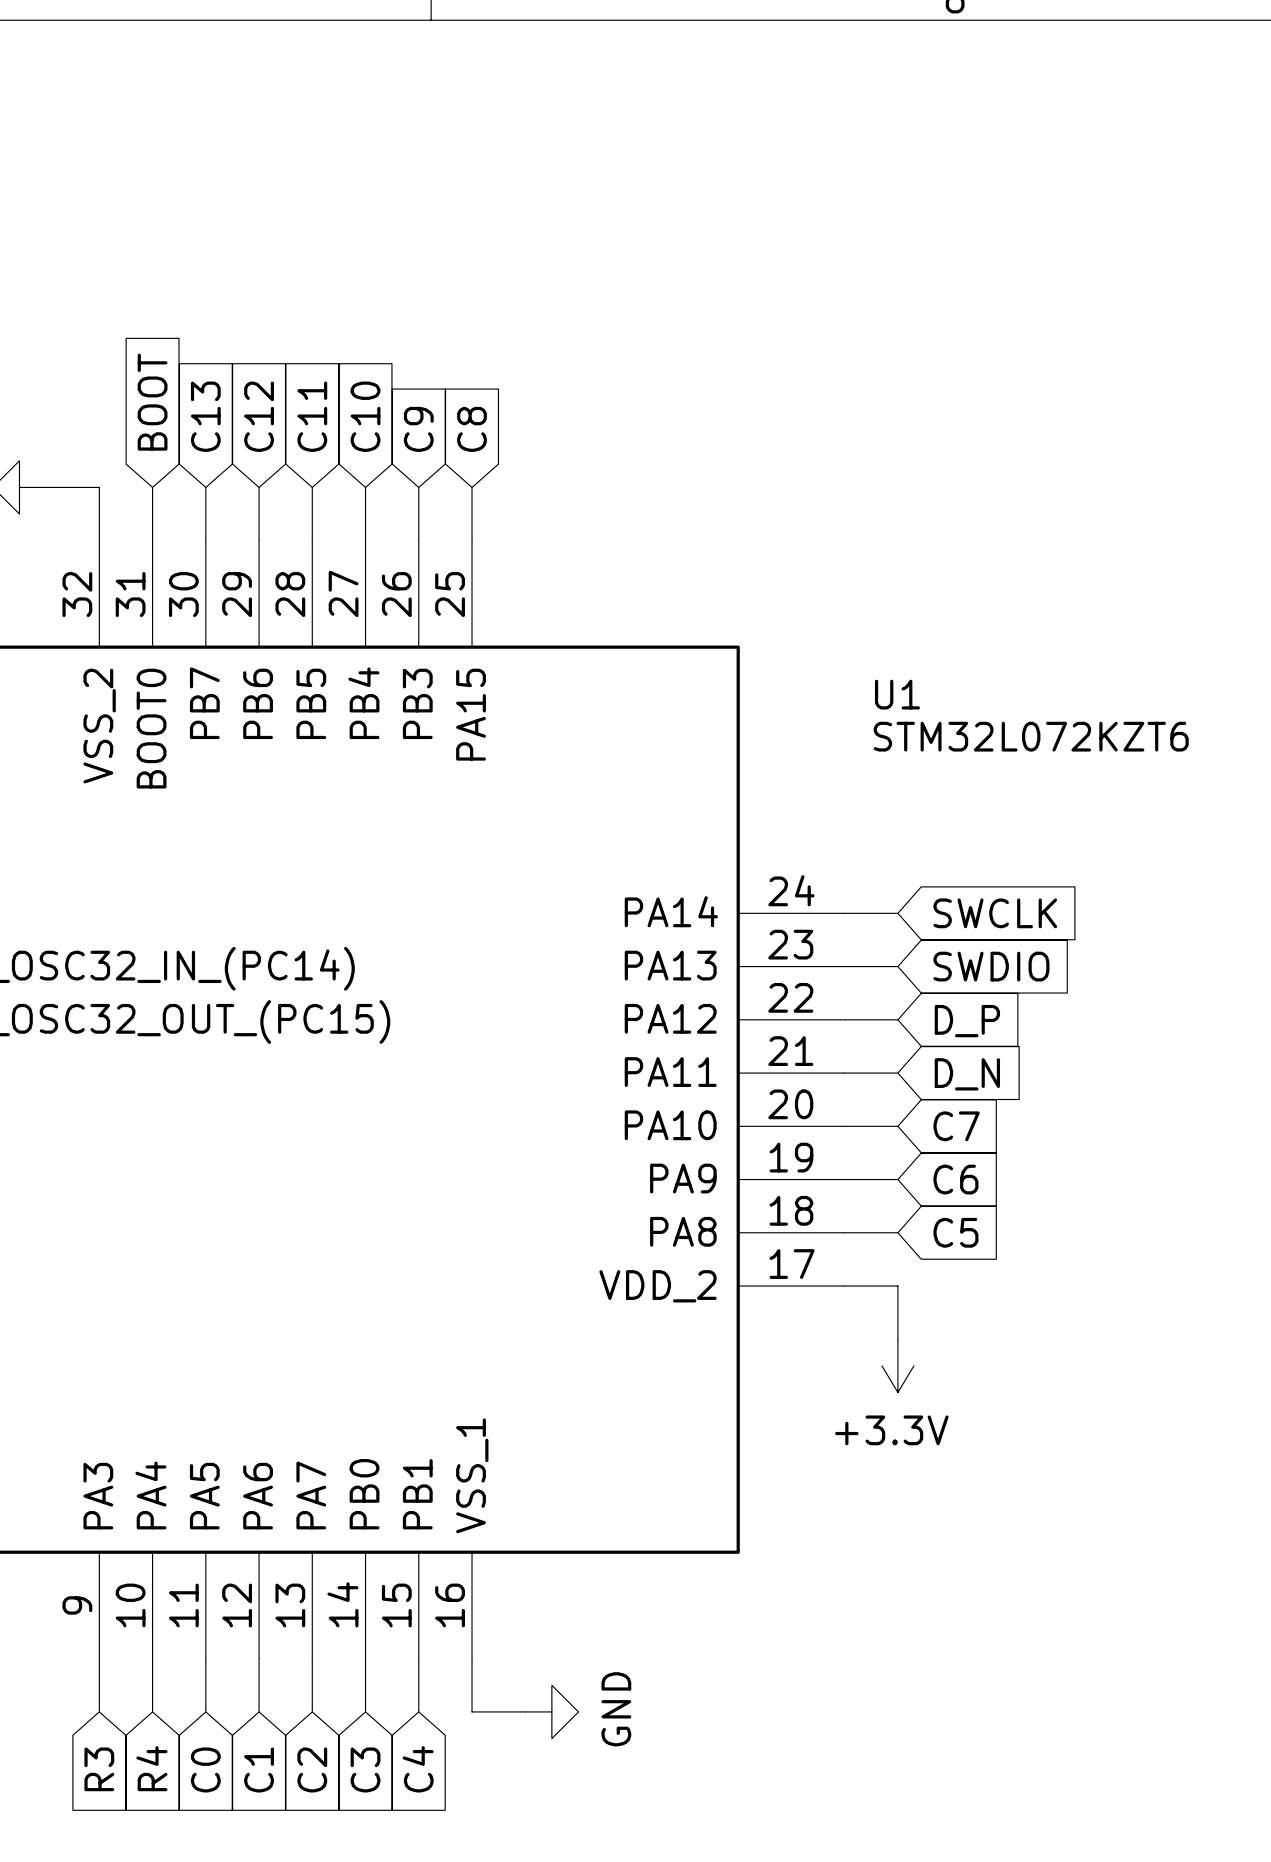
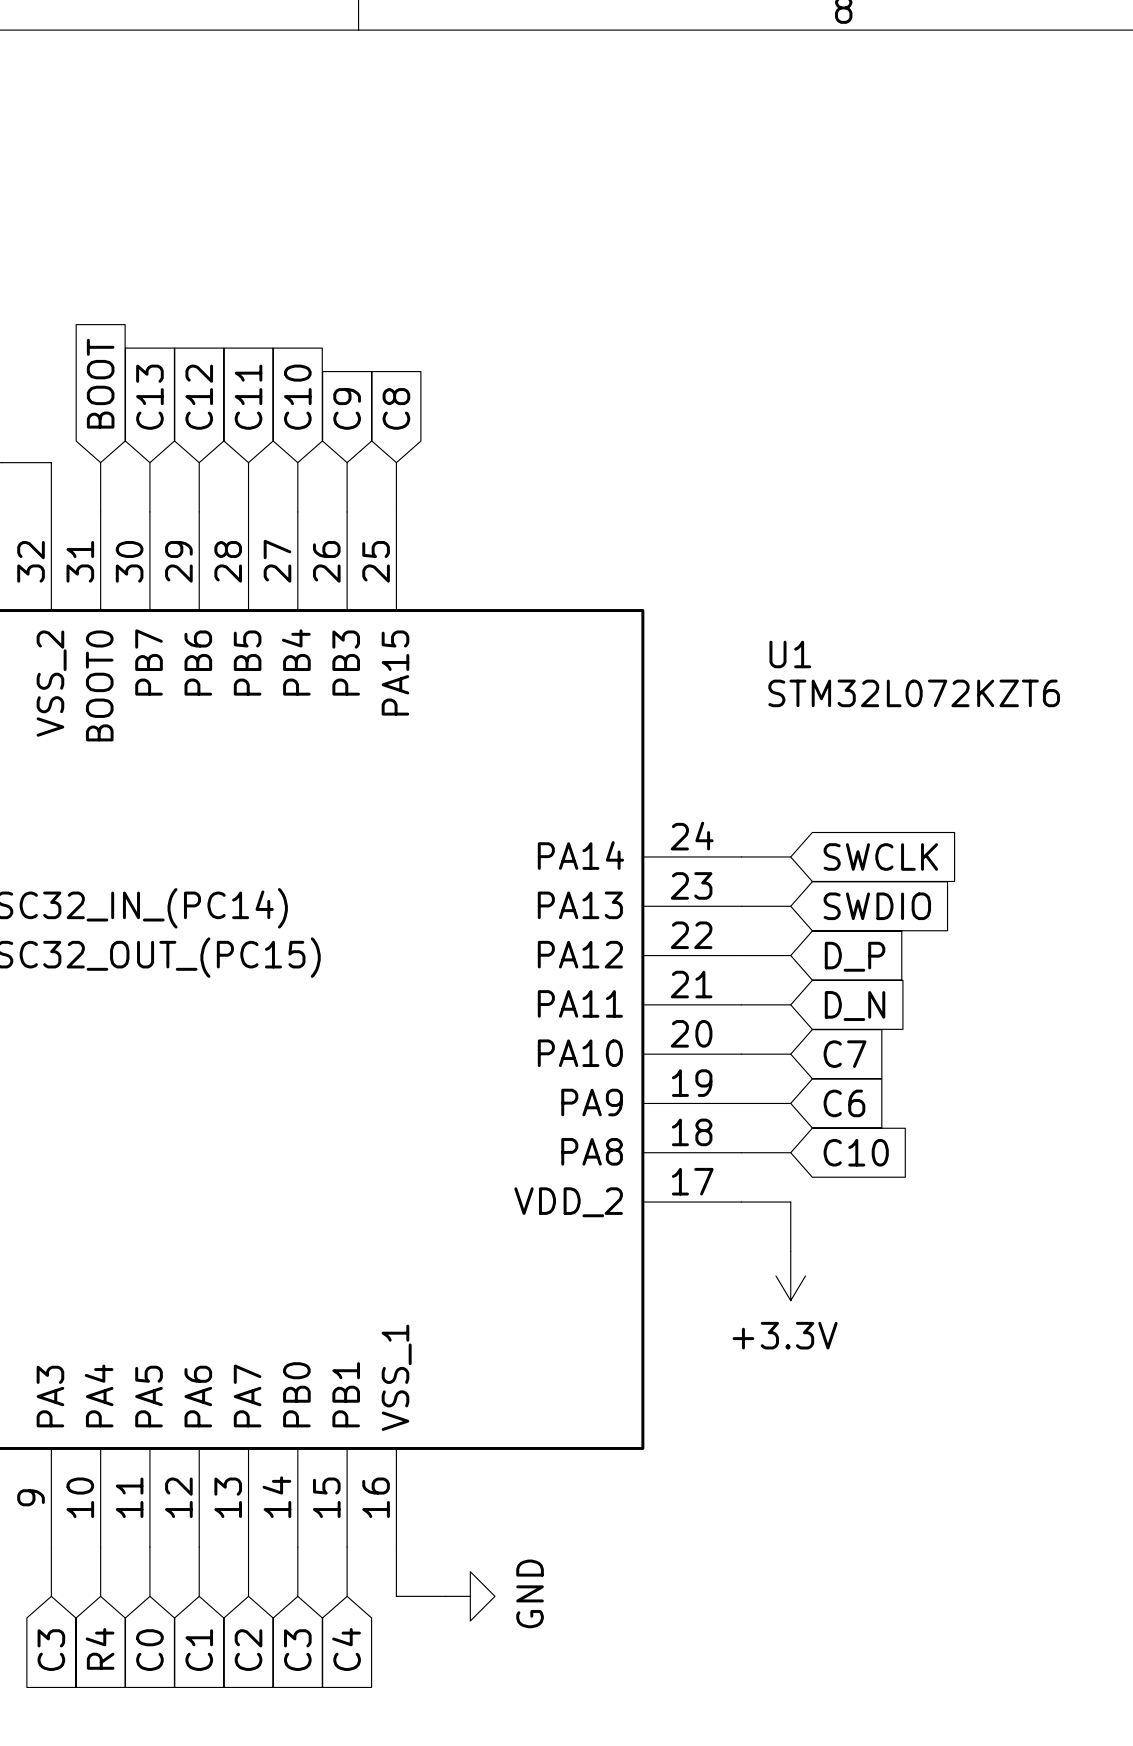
global label: C5 (955, 1232) -> C10 (856, 1152)
global label: R3 (99, 1769) -> C3 (51, 1650)

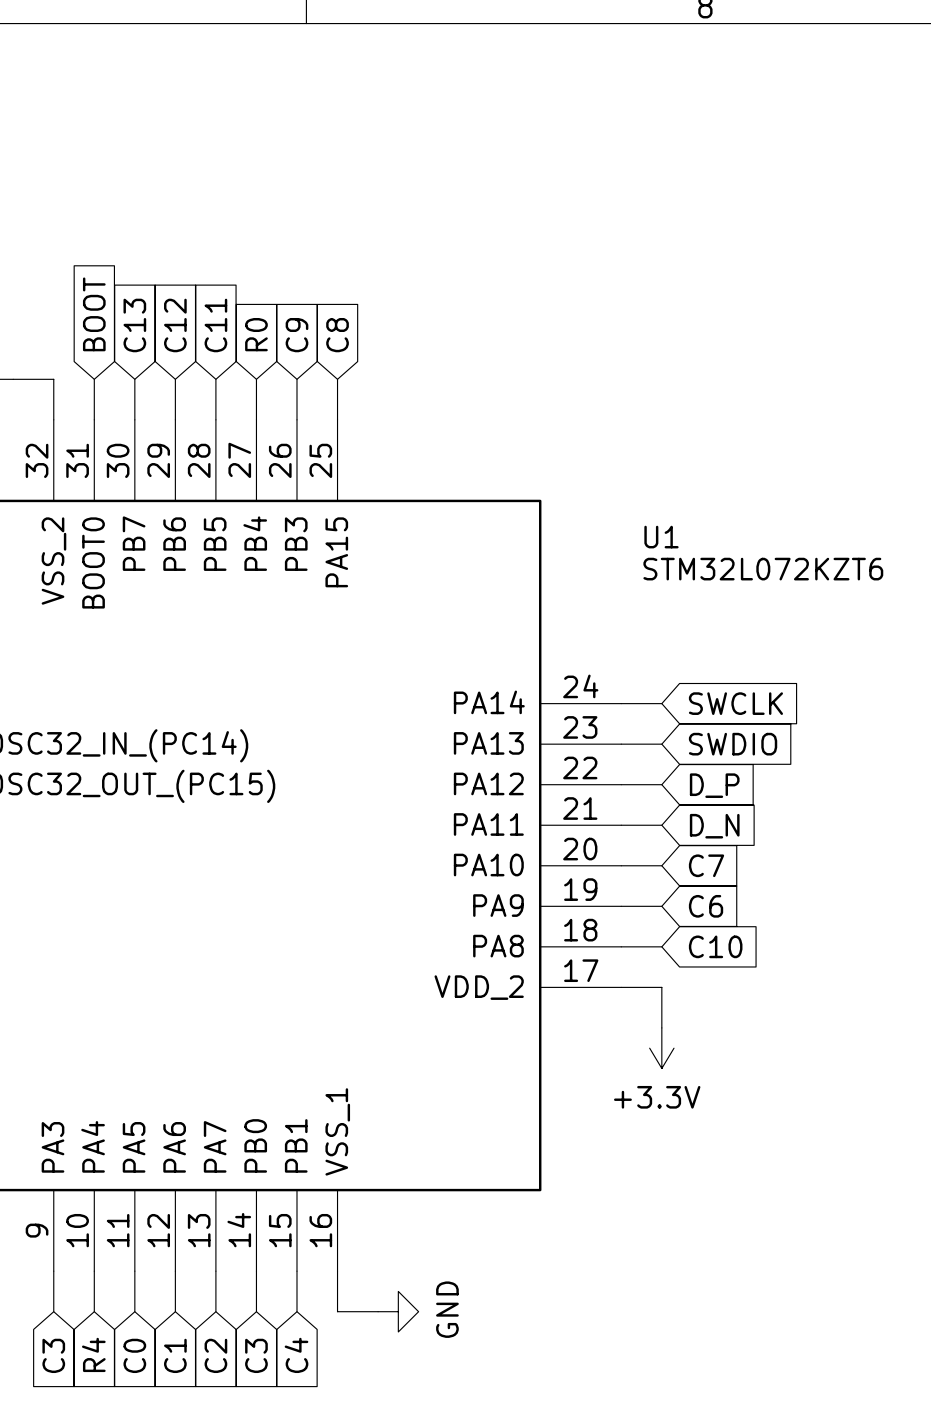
global label: C10 (297, 397) -> R0 (256, 334)

